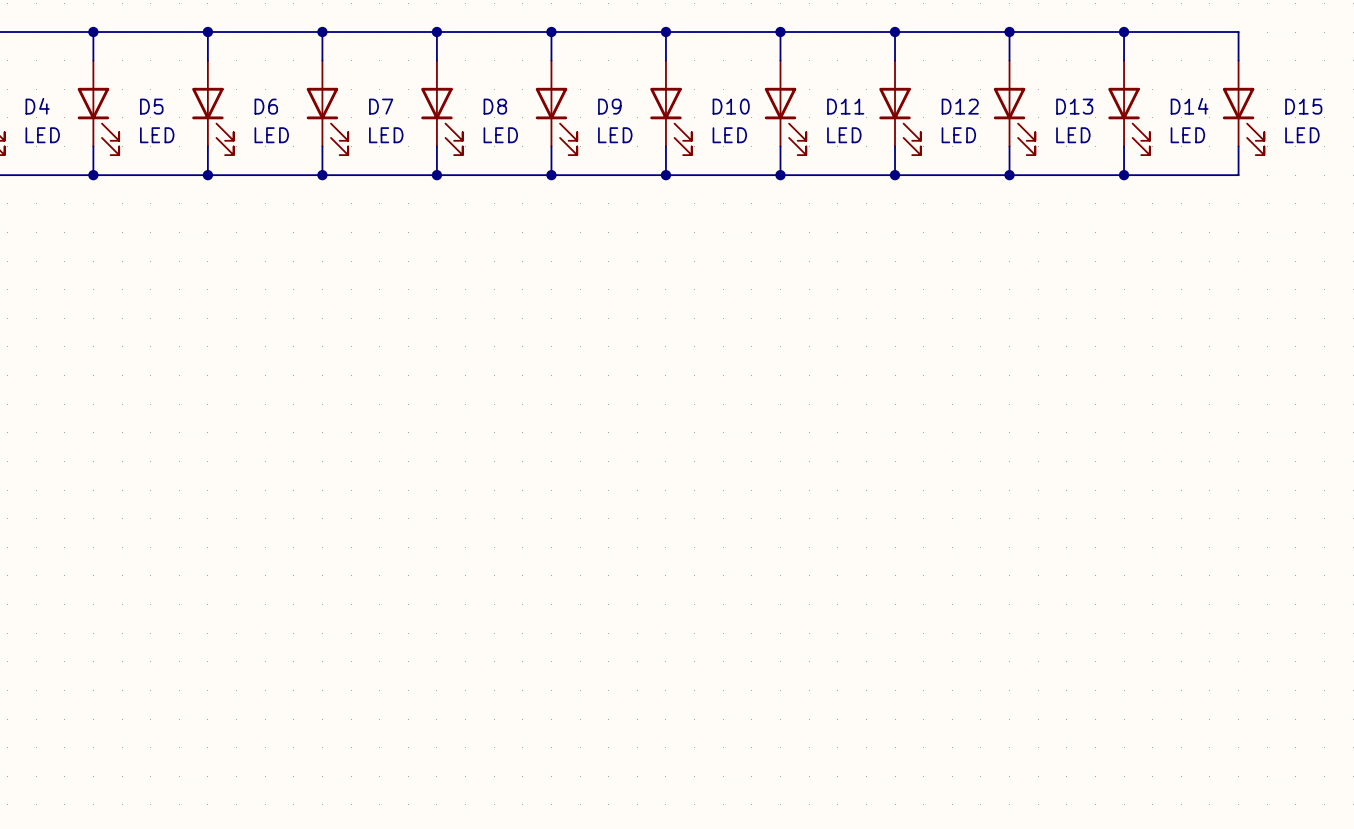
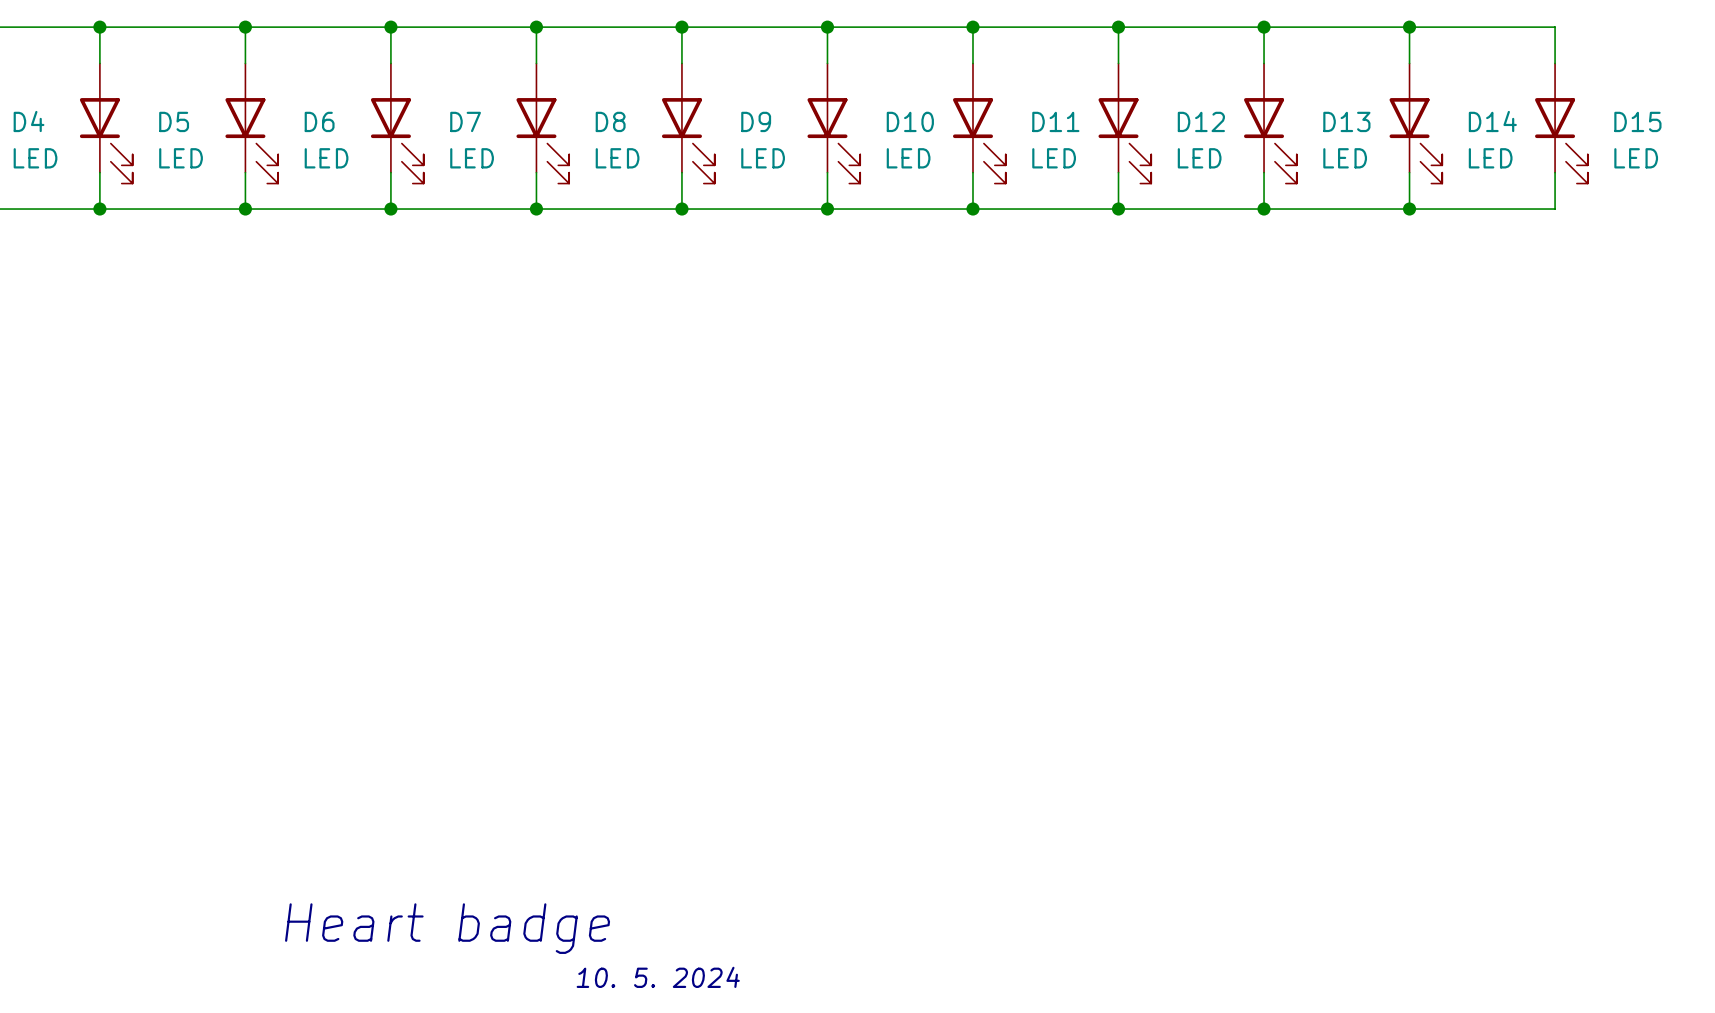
text: none -> Heart badge (447, 928)
text: none -> 10. 5. 2024 (658, 977)

